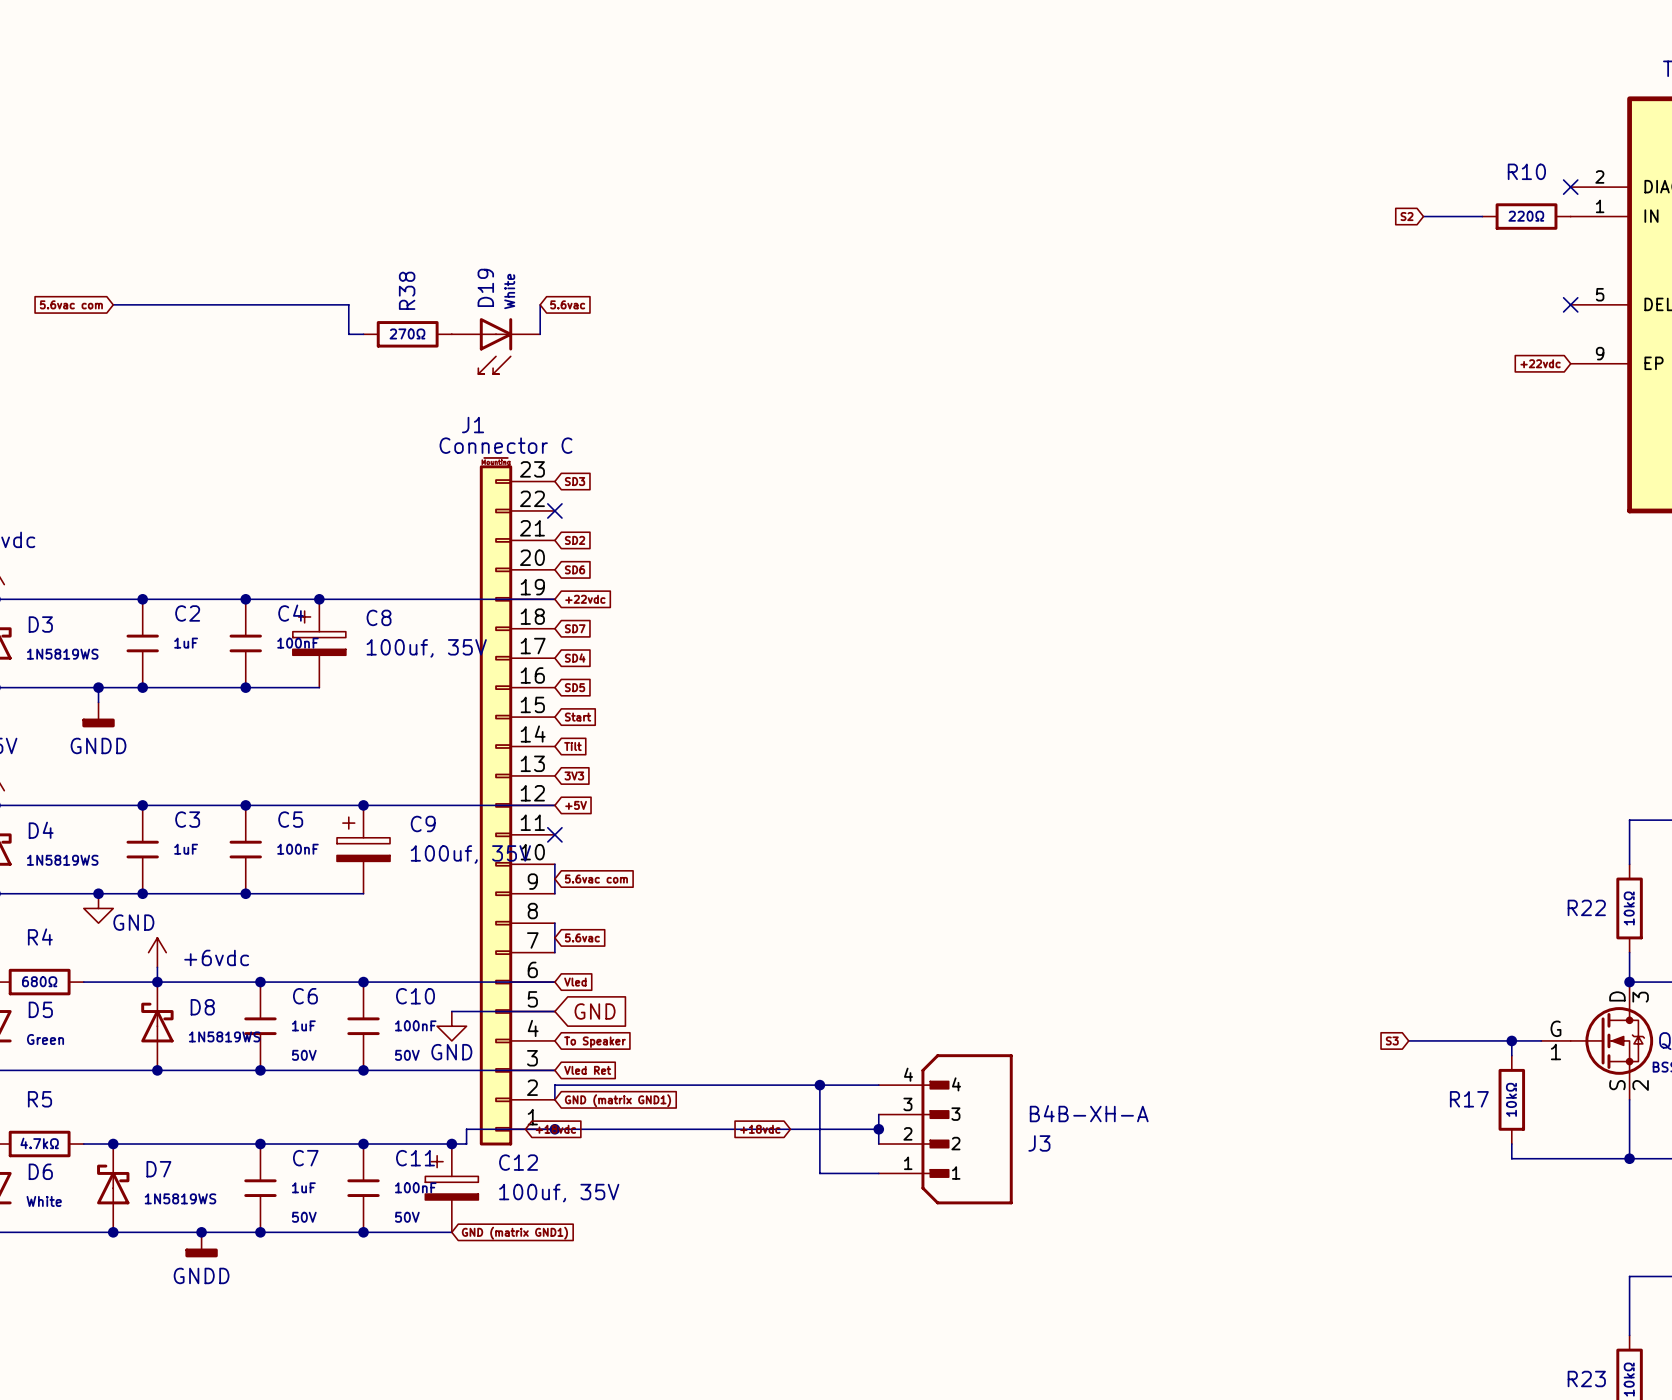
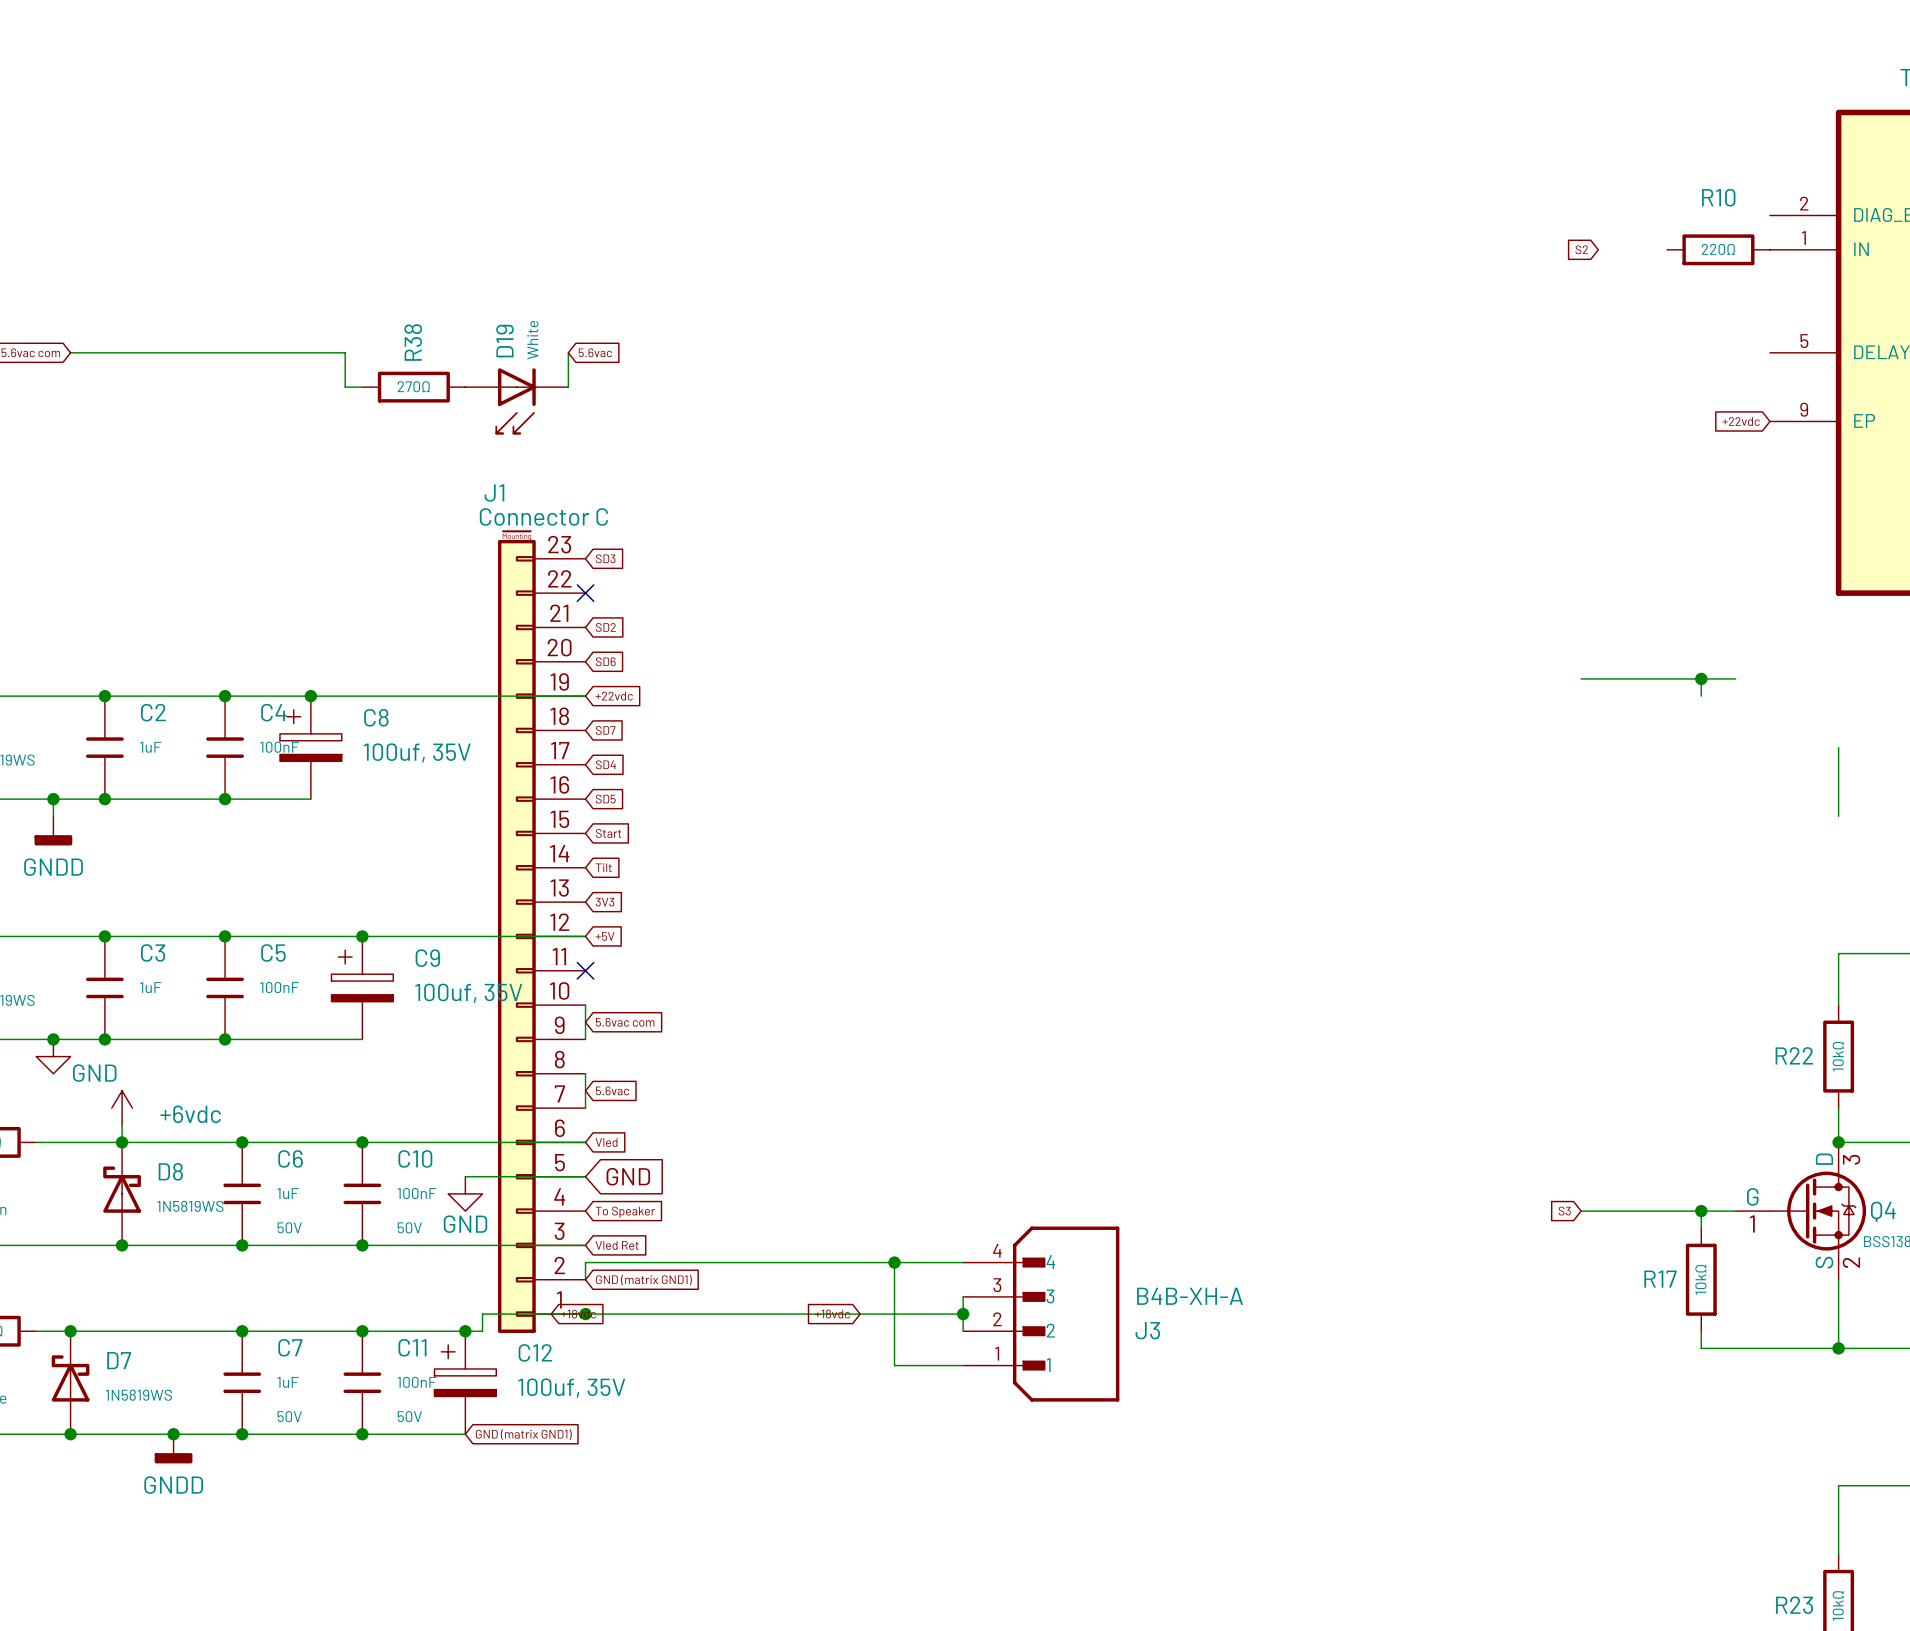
no-connect mark: (1570, 187) -> none
wire: (1423, 216) (1482, 216) -> none
no-connect mark: (1570, 304) -> none
wire: none -> (1581, 678) (1735, 678)
wire: none -> (1701, 678) (1701, 696)
junction: none -> (1701, 678)
wire: none -> (1838, 747) (1838, 816)

